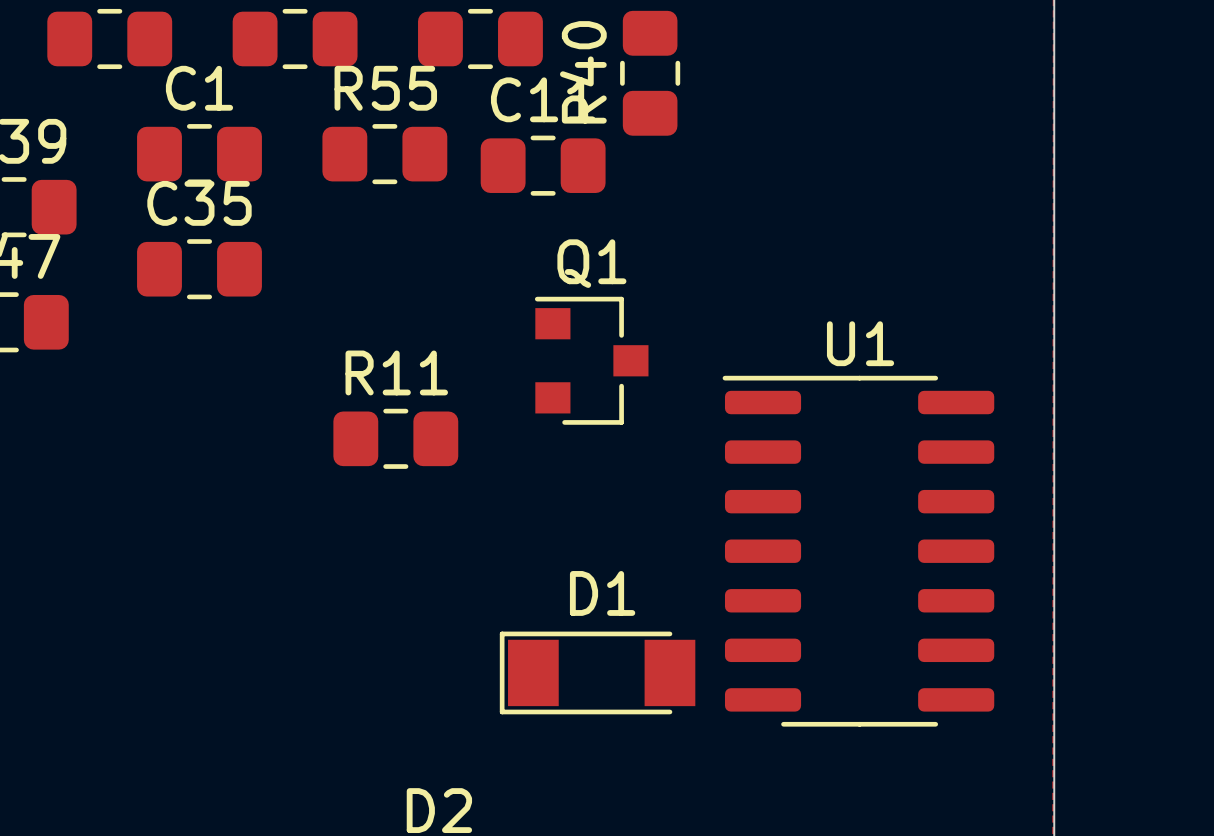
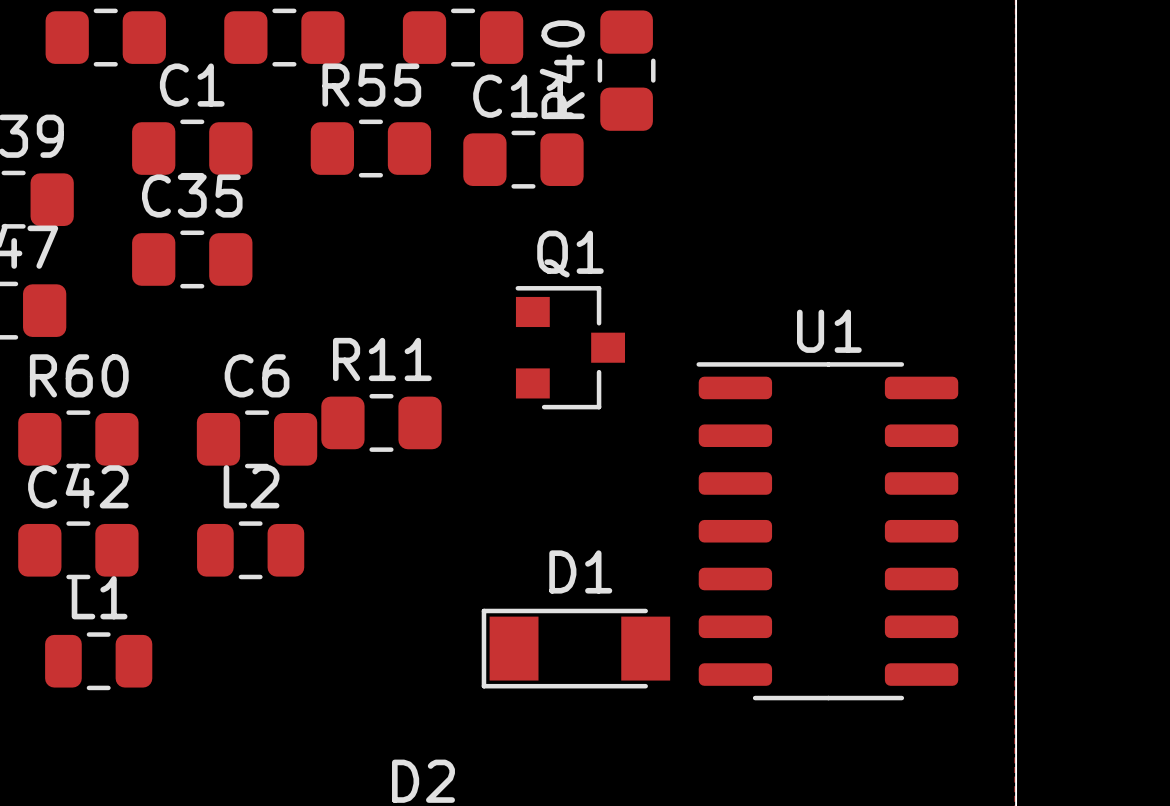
R60: none -> (78, 439)
C6: none -> (257, 439)
C42: none -> (78, 550)
L2: none -> (250, 550)
L1: none -> (98, 661)

